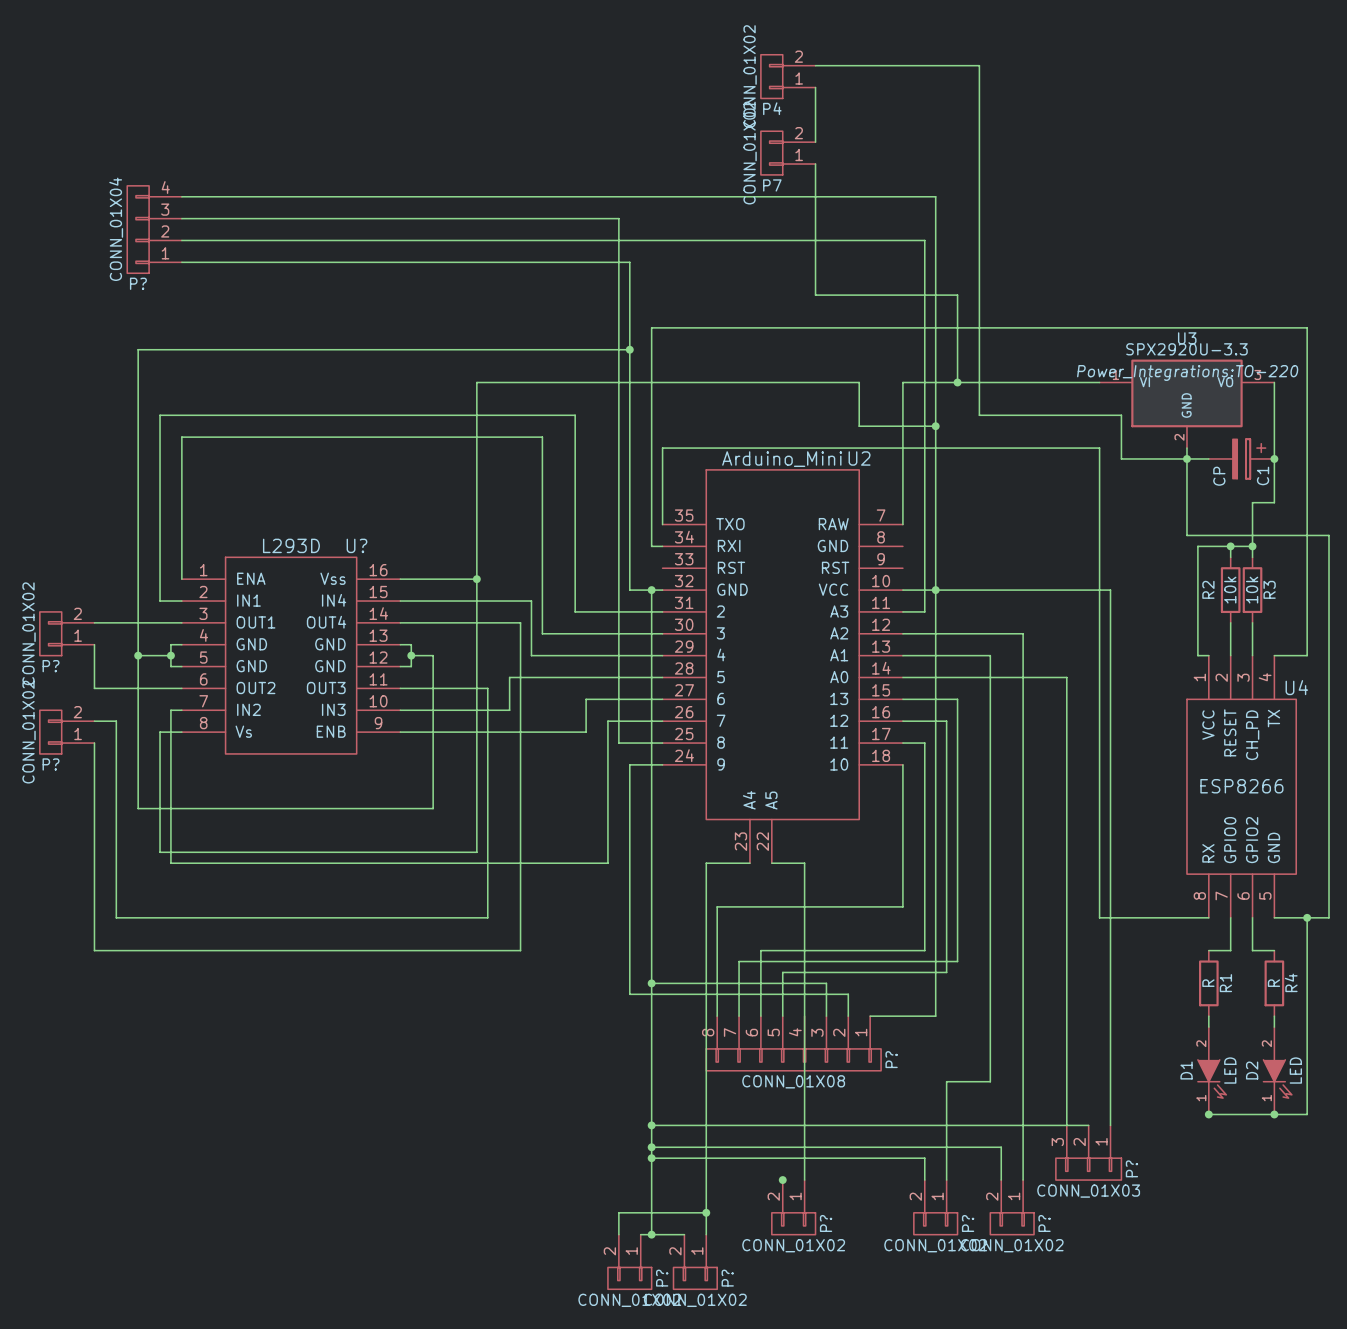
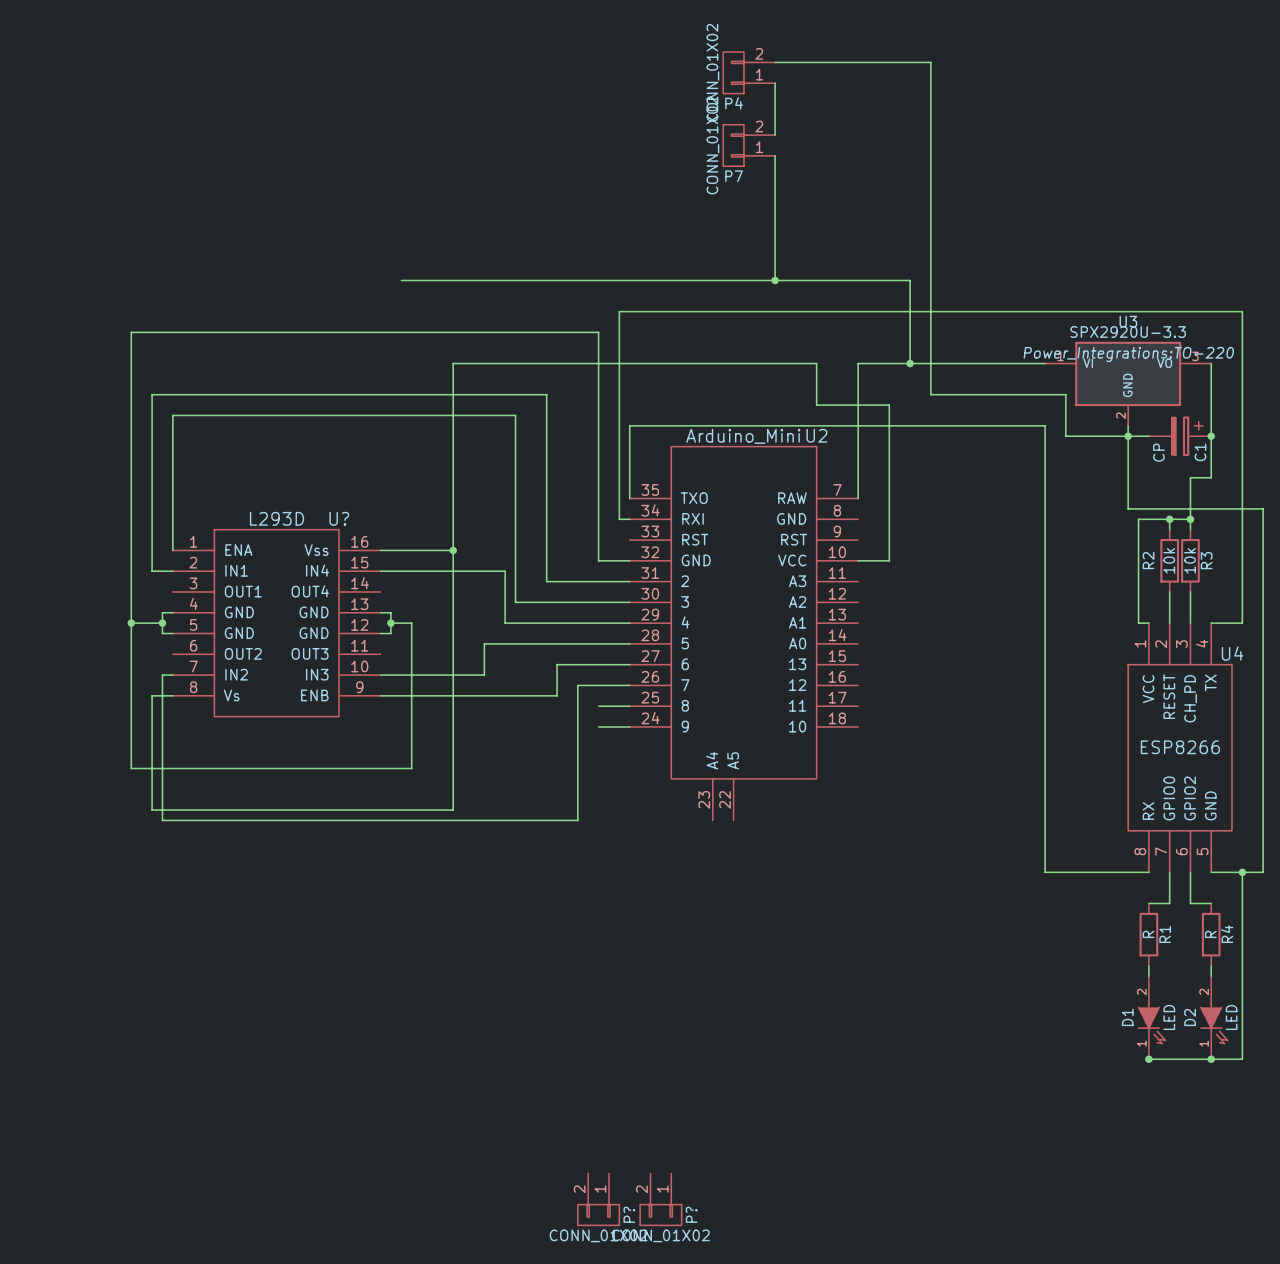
wire: (181, 196) (935, 196) (935, 426) -> none
wire: (181, 218) (618, 218) (618, 743) (629, 743) -> none
P?: CONN_01X04 (154, 229) -> none
wire: (181, 240) (924, 240) (924, 611) (902, 611) -> none
wire: (181, 262) (629, 262) (629, 349) -> none
wire: none -> (401, 280) (775, 280)
junction: none -> (775, 280)
junction: (629, 349) -> none
junction: (935, 426) -> none
wire: (651, 590) (651, 1234) -> none
junction: (651, 590) -> none
junction: (935, 590) -> none
wire: (94, 622) (181, 622) -> none
wire: (400, 622) (520, 622) (520, 950) (94, 950) (94, 743) -> none
P?: CONN_01X02 (67, 633) -> none
wire: (902, 633) (1023, 633) (1023, 1180) -> none
wire: (94, 644) (94, 688) (181, 688) -> none
wire: (902, 655) (990, 655) (990, 1081) (946, 1081) (946, 1180) -> none
wire: (902, 677) (1066, 677) (1066, 1125) -> none
wire: (400, 688) (487, 688) (487, 917) (116, 917) (116, 721) (94, 721) -> none
wire: (902, 699) (957, 699) (957, 961) (739, 961) (739, 1016) -> none
wire: (902, 721) (946, 721) (946, 972) (782, 972) (782, 1016) -> none
P?: CONN_01X02 (67, 732) -> none
wire: (902, 743) (924, 743) (924, 950) (760, 950) (760, 1016) -> none
wire: (629, 764) (629, 994) (848, 994) (848, 1016) -> none
wire: (902, 764) (902, 906) (717, 906) (717, 1016) -> none
wire: (749, 863) (706, 863) (706, 1234) -> none
wire: (771, 863) (804, 863) (804, 1180) -> none
wire: (651, 983) (826, 983) (826, 1016) -> none
junction: (651, 983) -> none
wire: (870, 1016) (935, 1016) (935, 590) (1110, 590) (1110, 1125) -> none
P?: CONN_01X08 (793, 1043) -> none
wire: (651, 1125) (1088, 1125) -> none
junction: (651, 1125) -> none
wire: (651, 1147) (1001, 1147) (1001, 1180) -> none
junction: (651, 1147) -> none
P?: CONN_01X03 (1088, 1152) -> none
wire: (651, 1158) (924, 1158) (924, 1180) -> none
junction: (651, 1158) -> none
junction: (782, 1180) -> none
P?: CONN_01X02 (793, 1207) -> none
P?: CONN_01X02 (935, 1207) -> none
P?: CONN_01X02 (1012, 1207) -> none
wire: (706, 1212) (618, 1212) (618, 1234) -> none
junction: (706, 1212) -> none
wire: (640, 1234) (684, 1234) -> none
junction: (651, 1234) -> none

